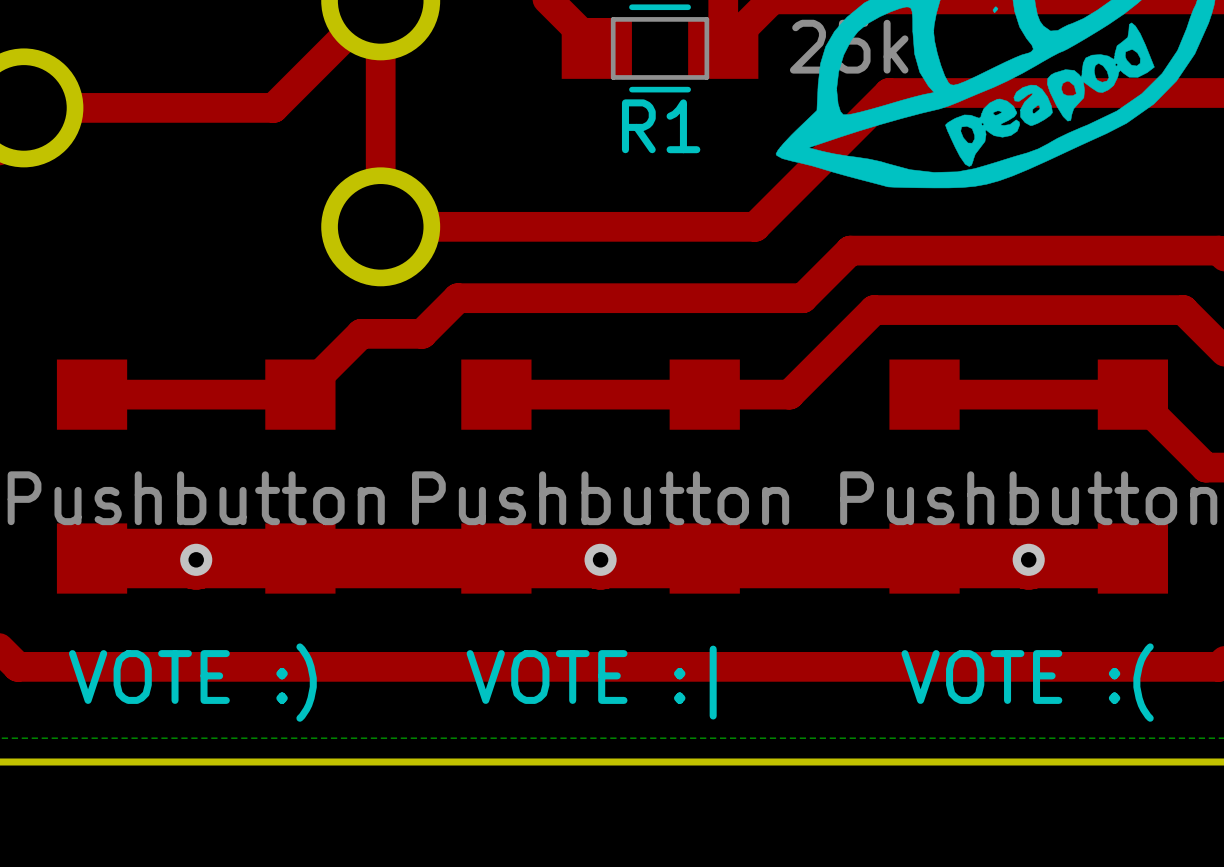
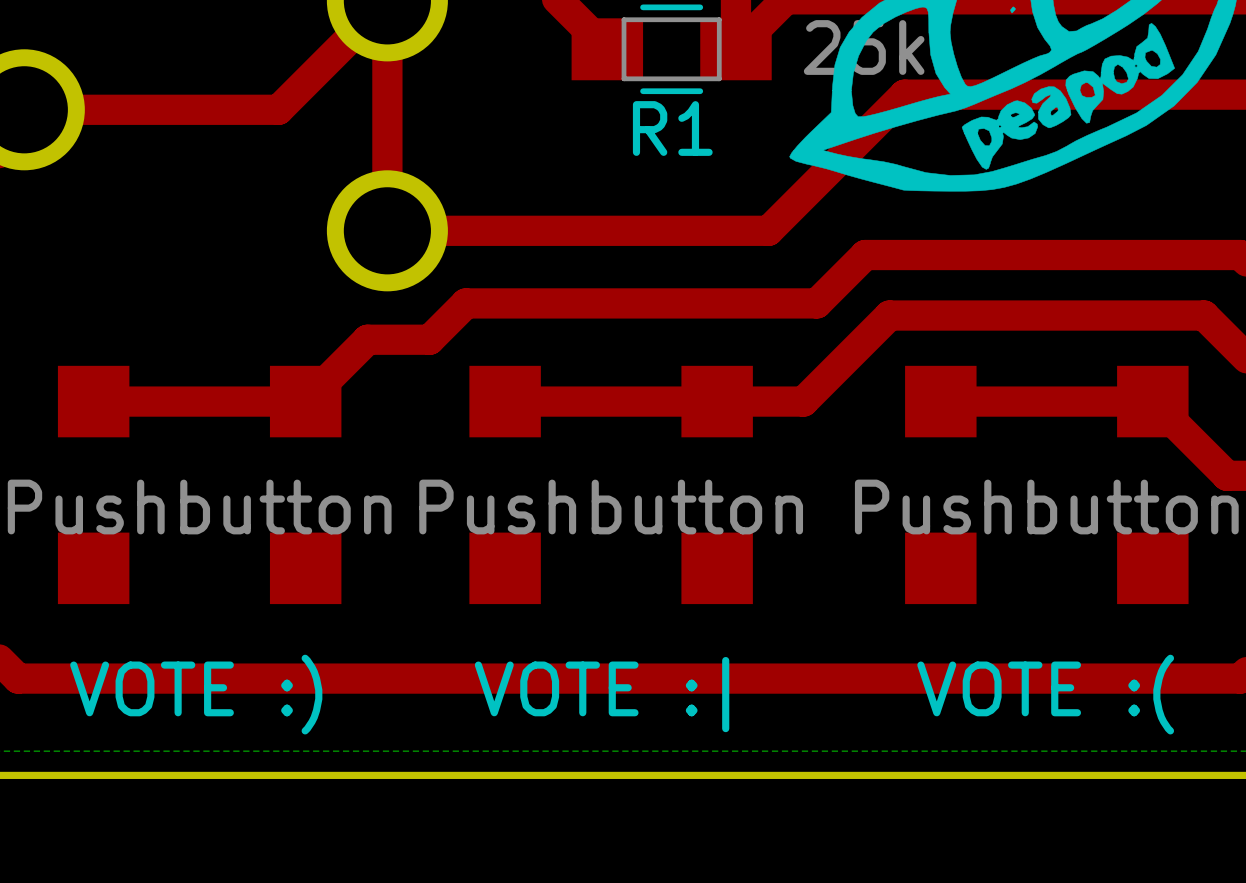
top track: (92, 558) (1132, 558) -> none
via: (196, 559) -> none
via: (600, 559) -> none
via: (1028, 559) -> none

